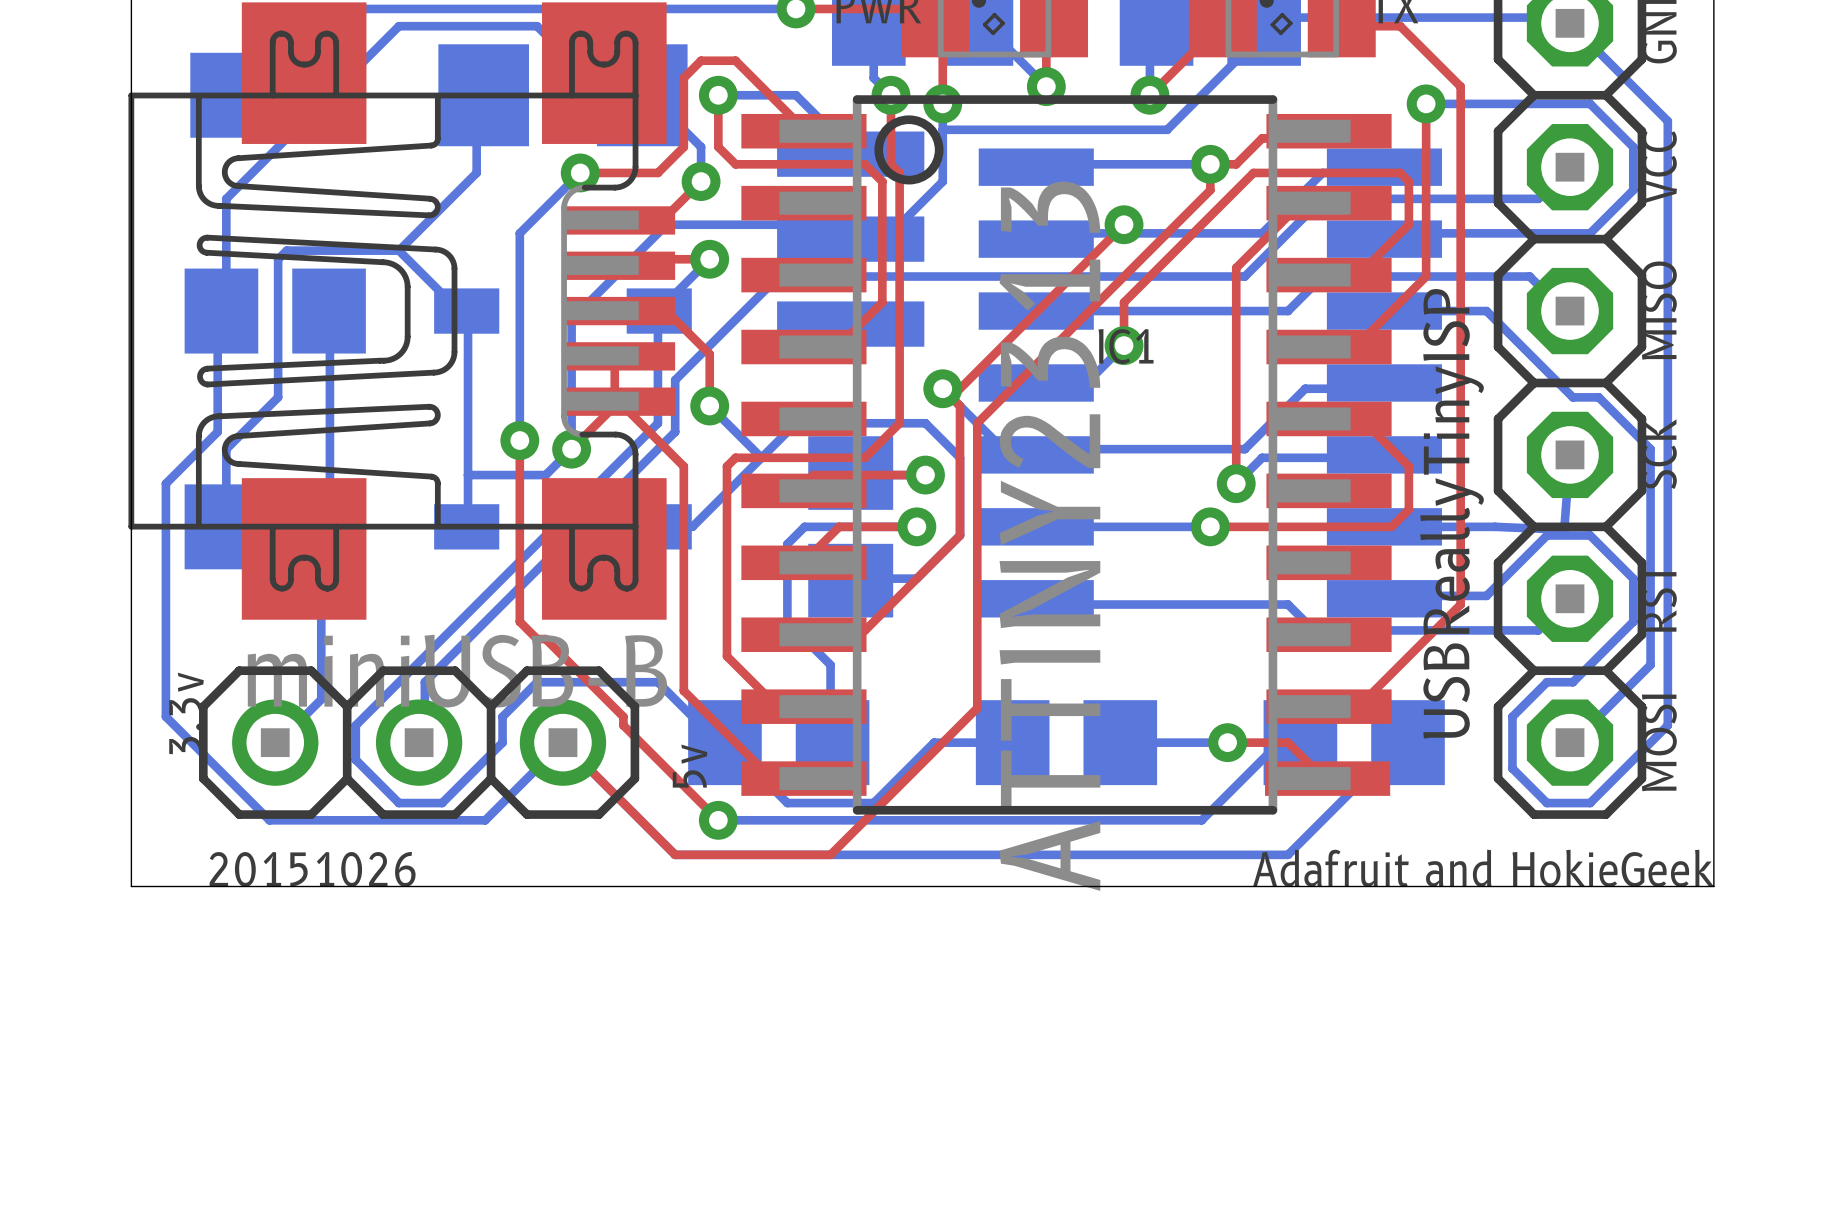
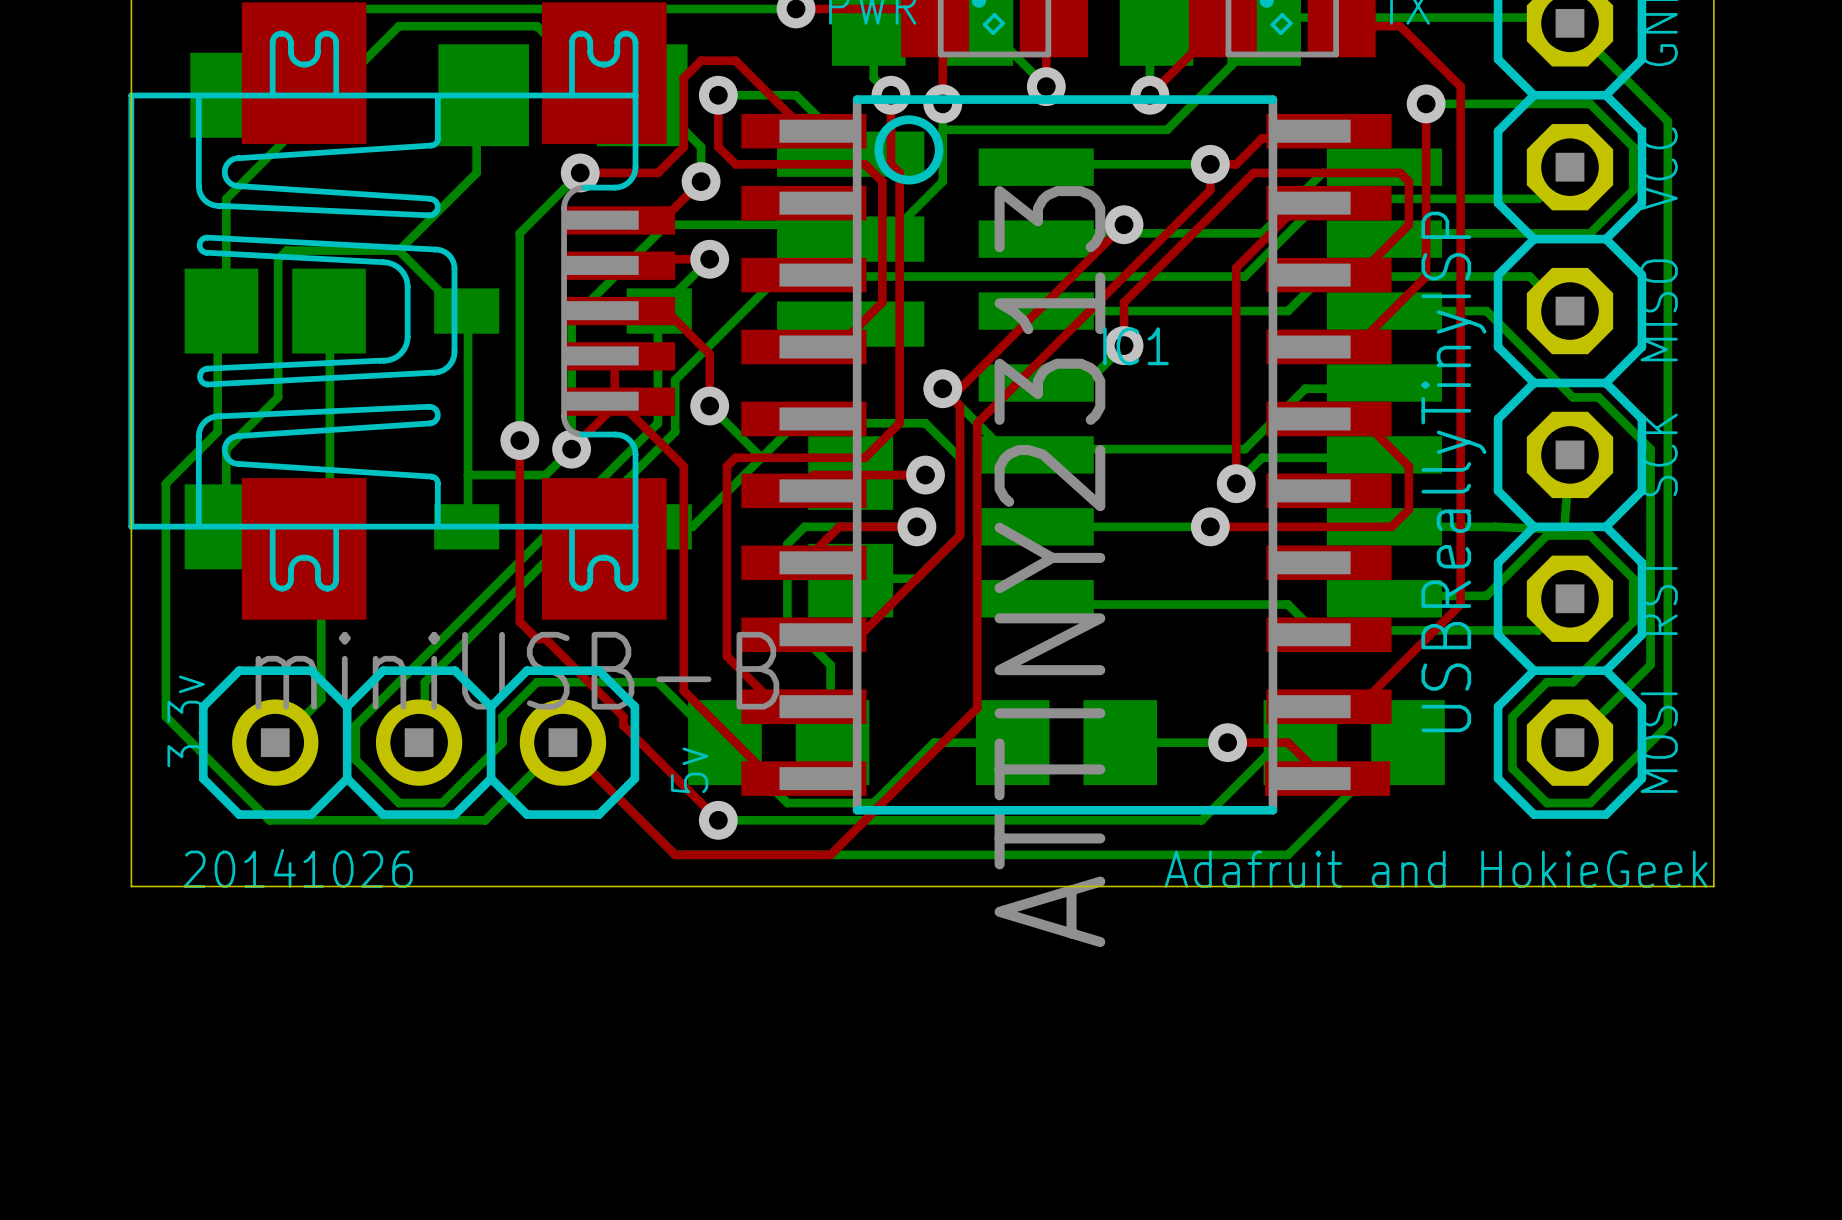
text: 20151026 (312, 869) -> 20141026 (298, 868)

